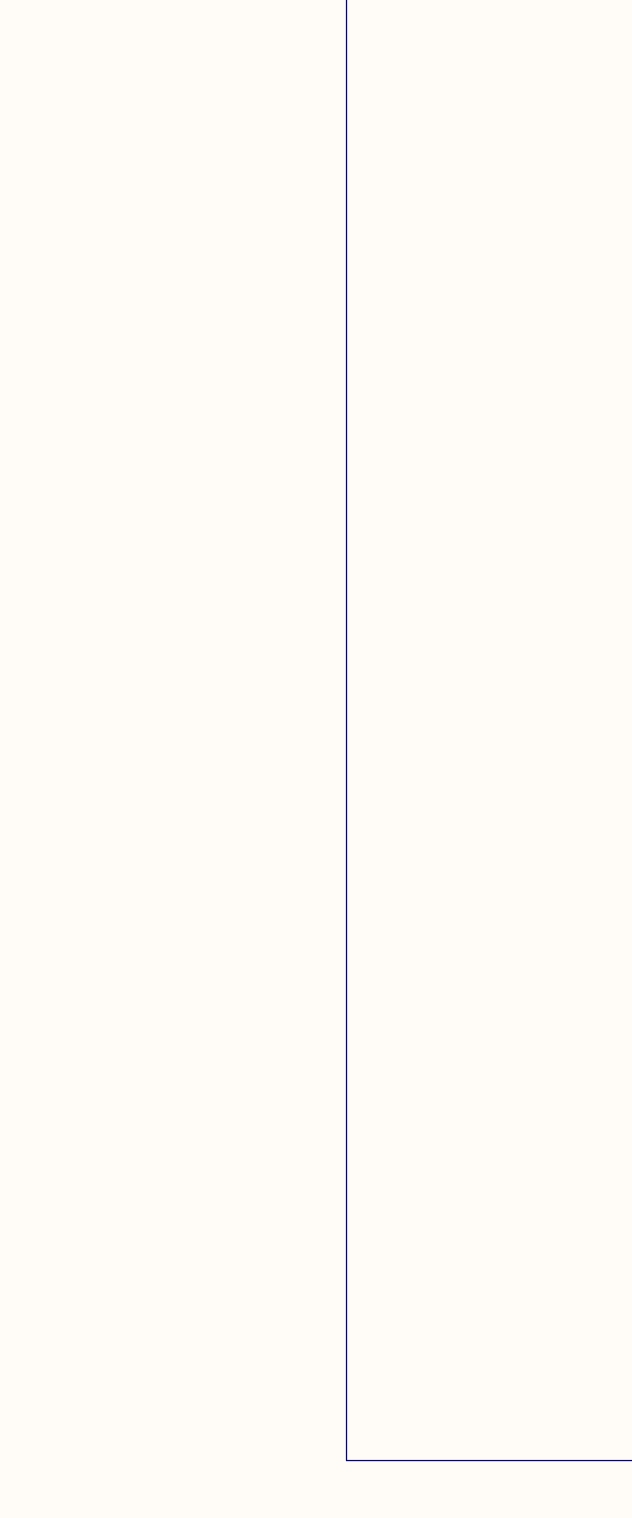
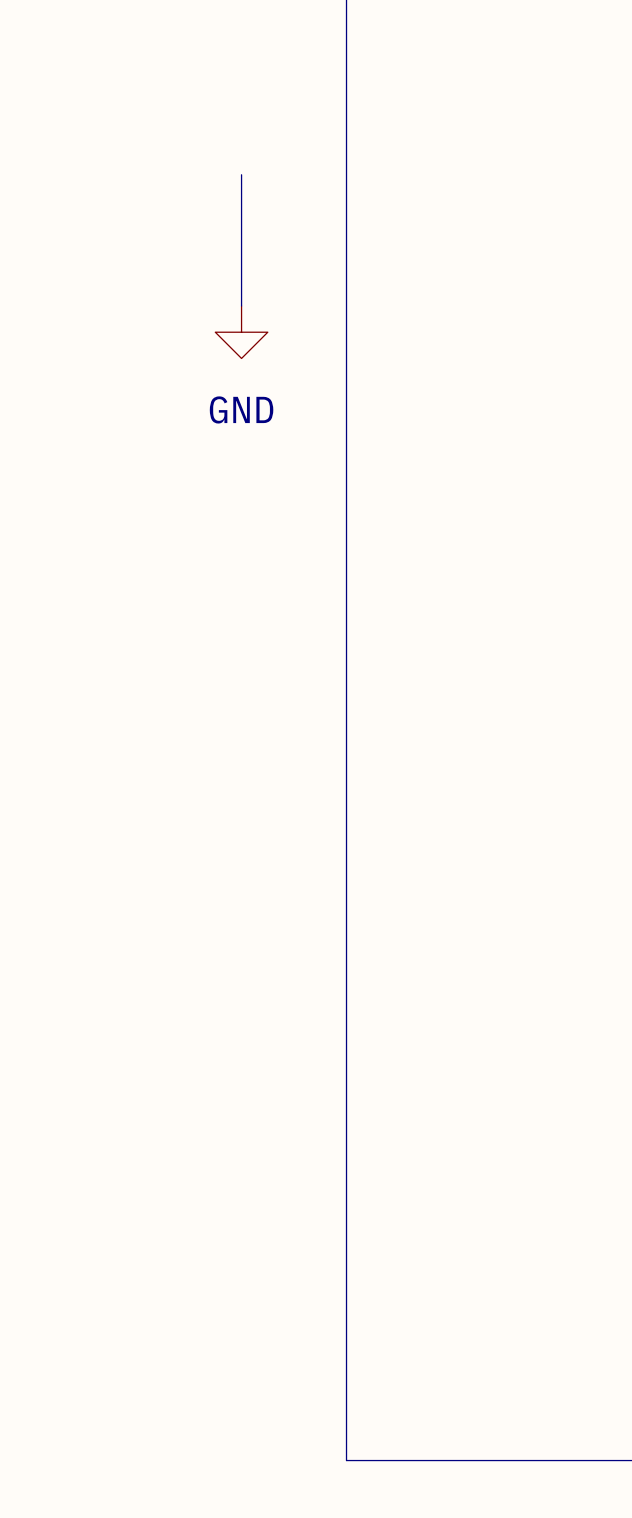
wire: none -> (241, 174) (241, 305)
power symbol: none -> GND (241, 332)

